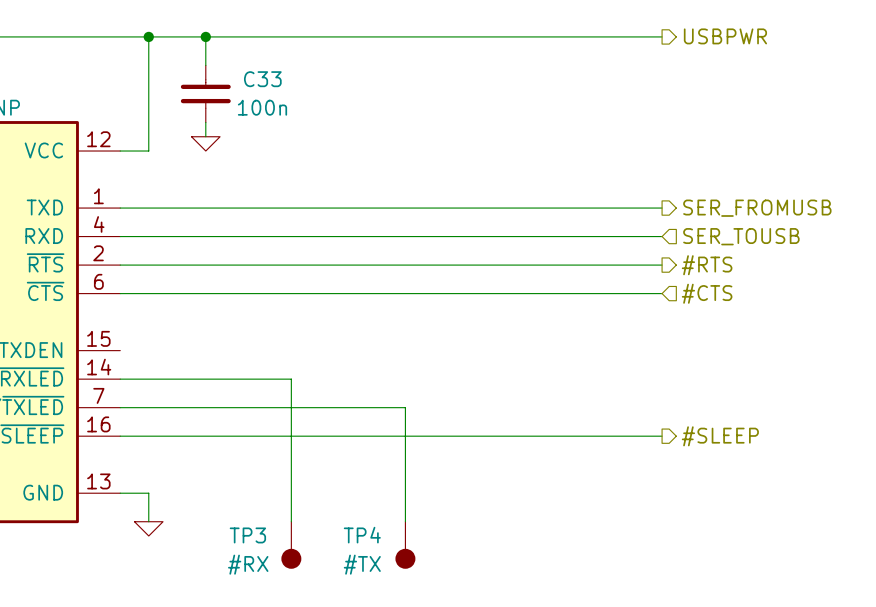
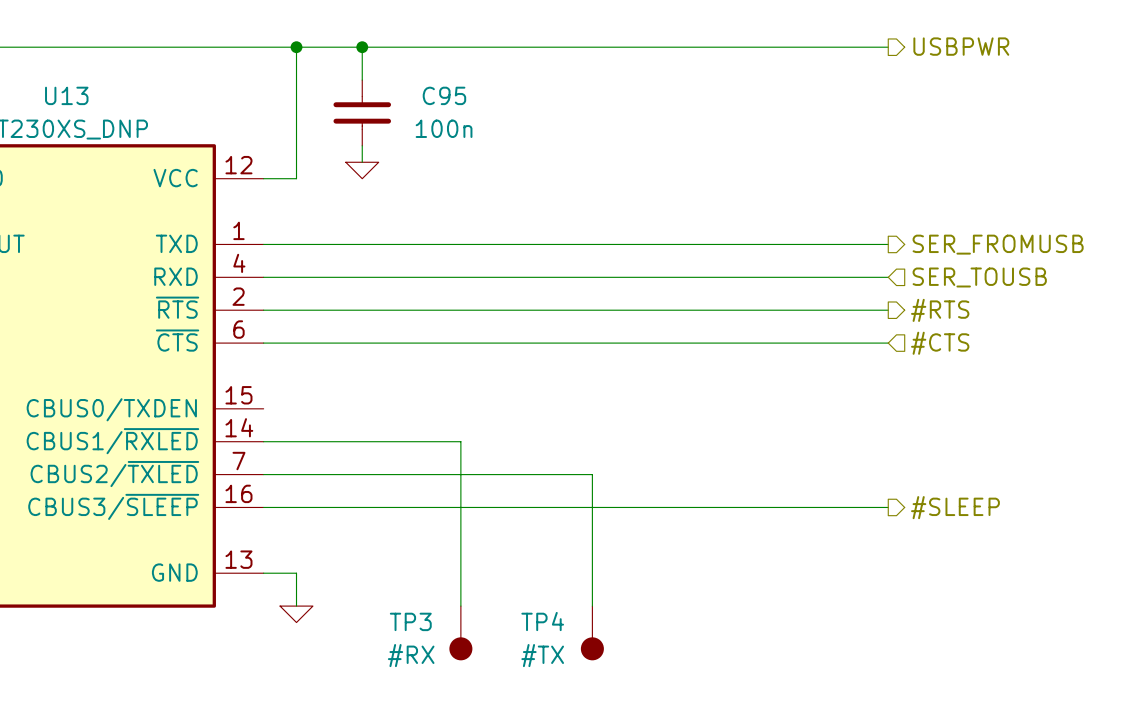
C33: 100n (205, 93) -> none
C95: none -> 100n (362, 112)

